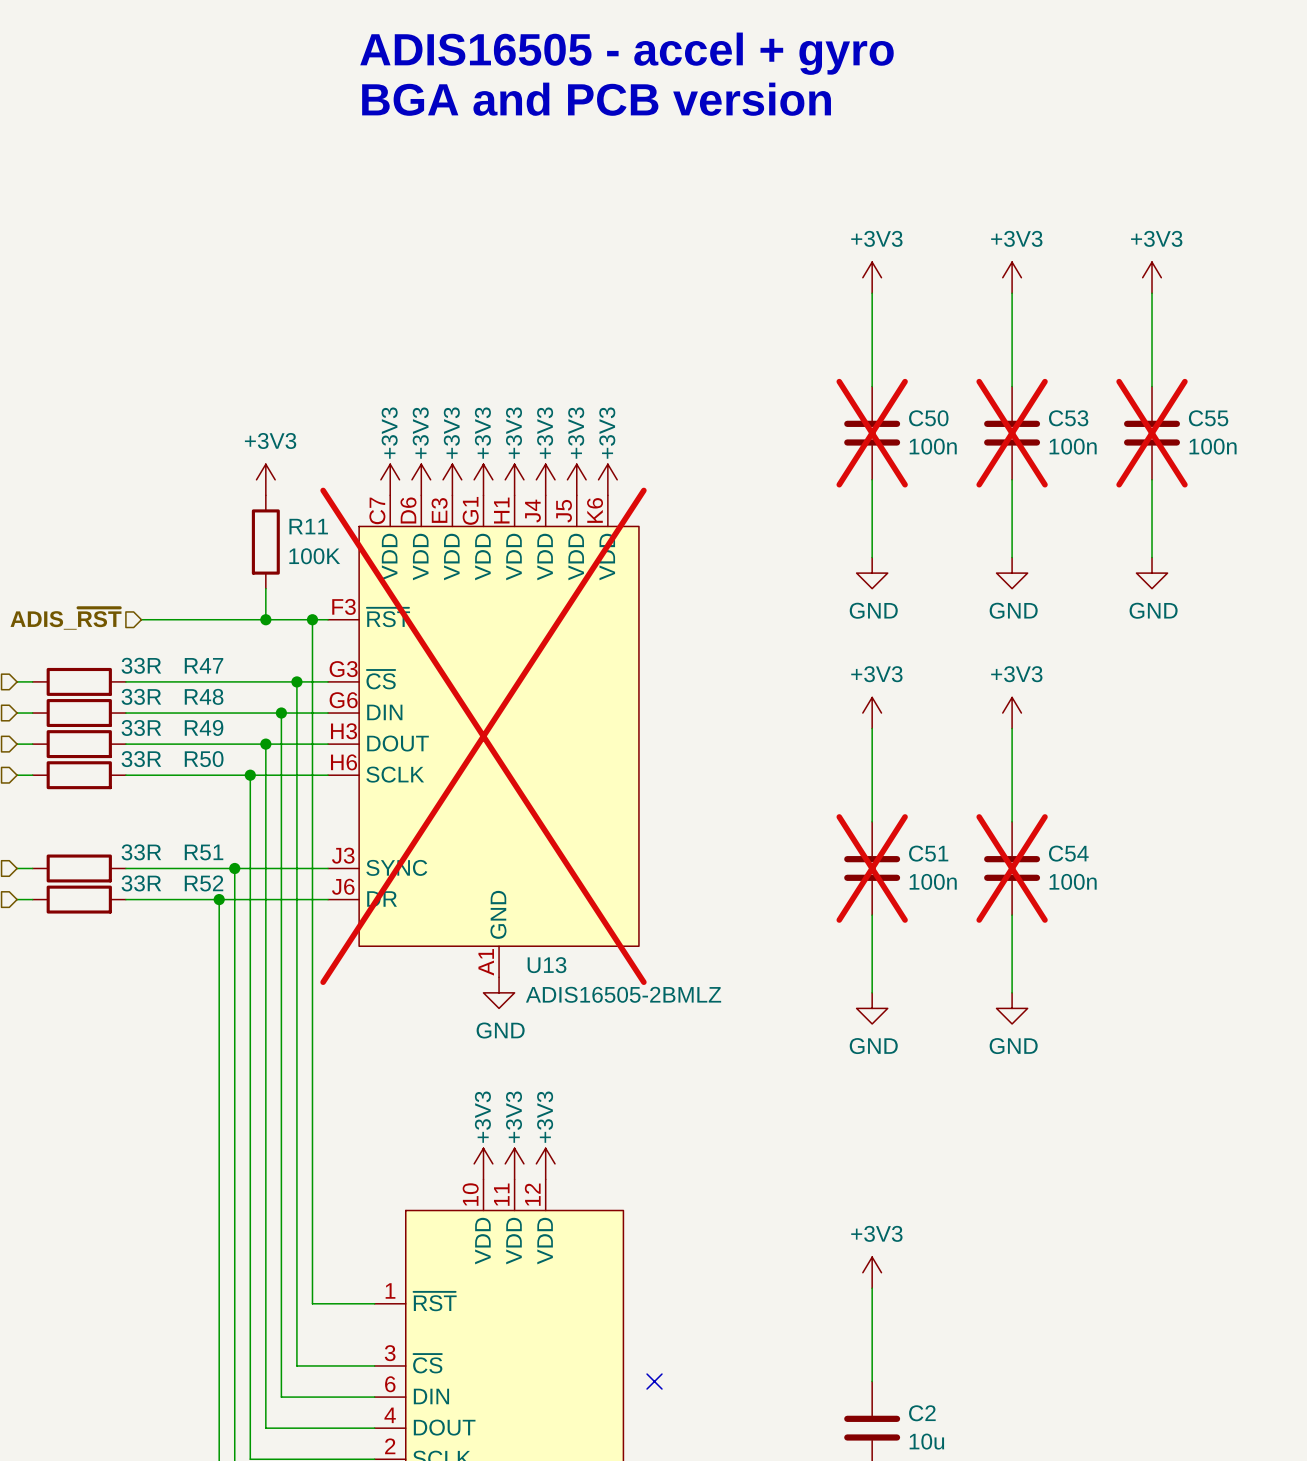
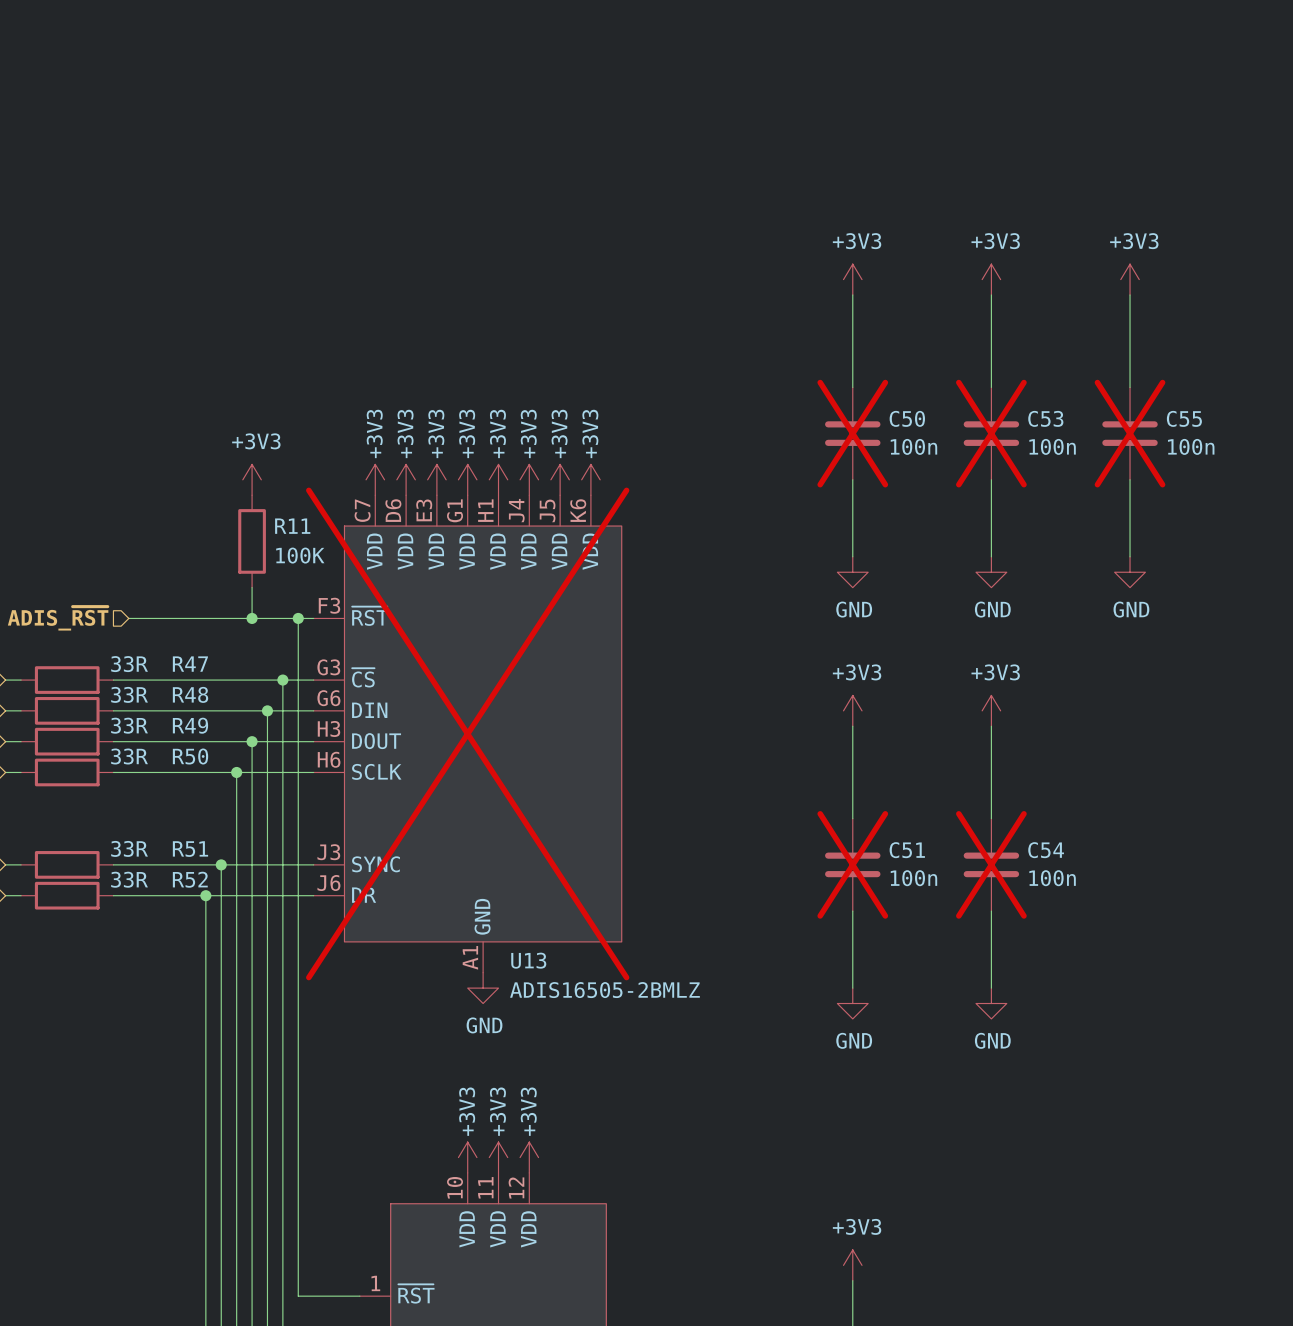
text: ADIS16505 - accel + gyro (626, 53) -> none
text: BGA and PCB version (596, 99) -> none

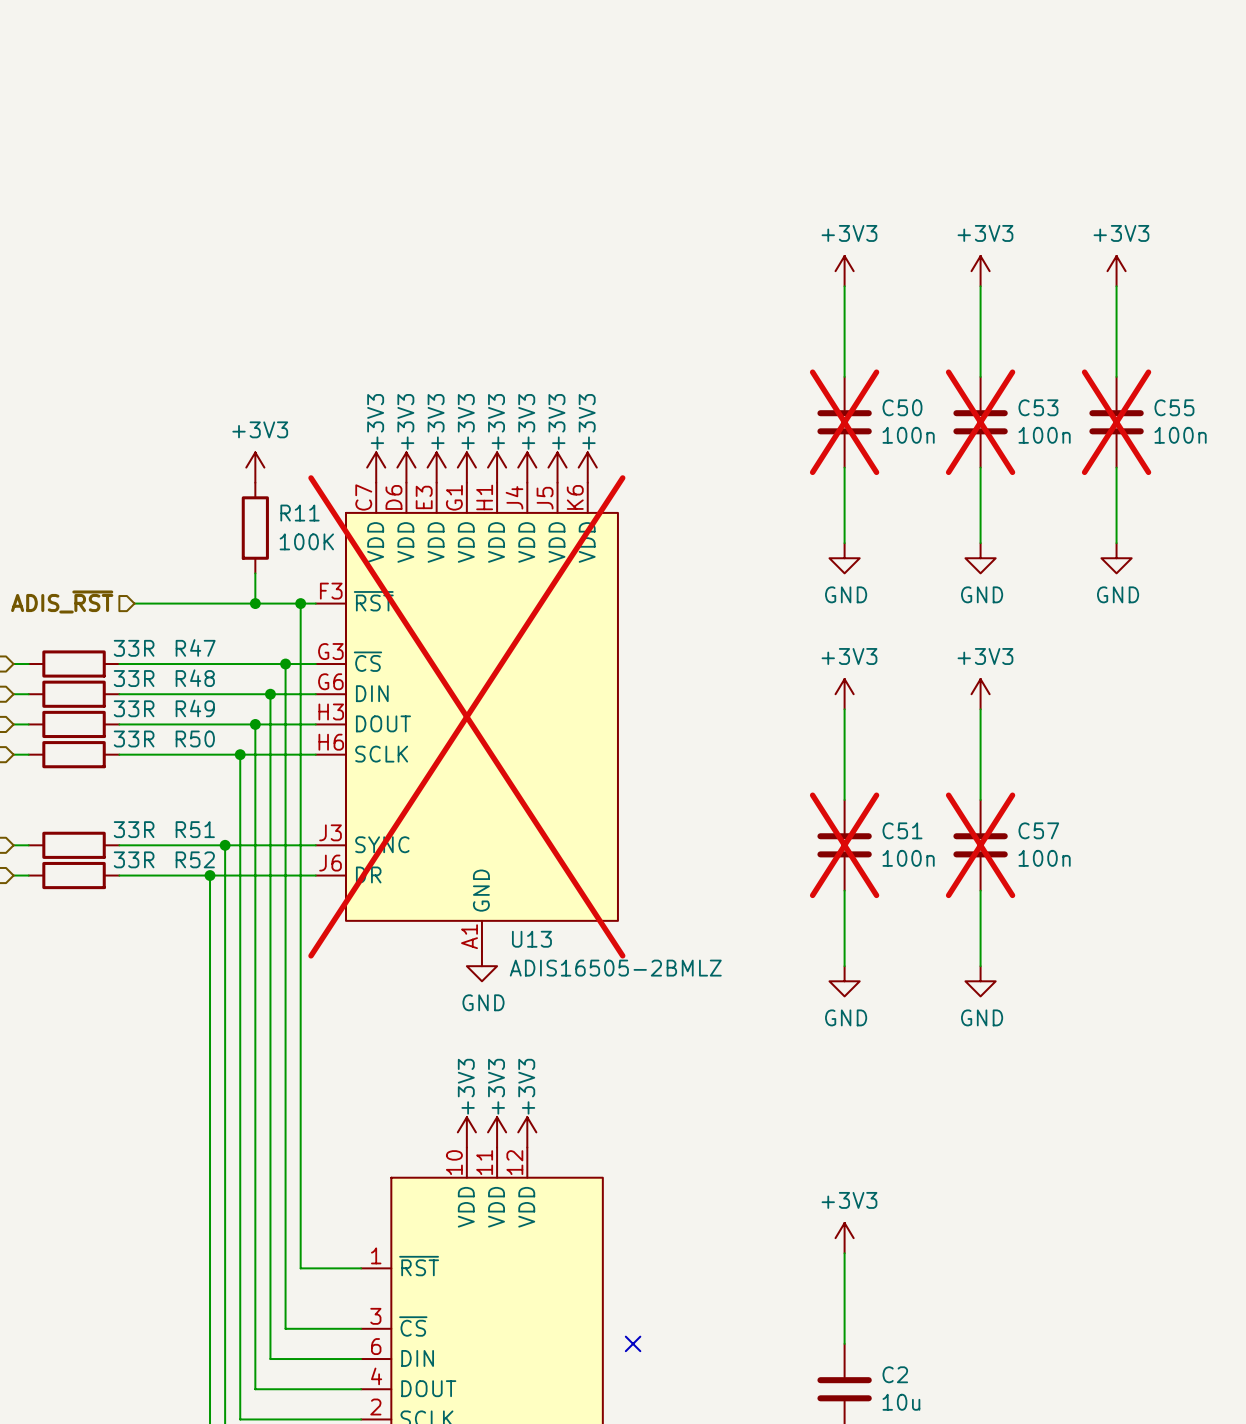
C54 name: C54 (1046, 850) -> C57 (1038, 830)

